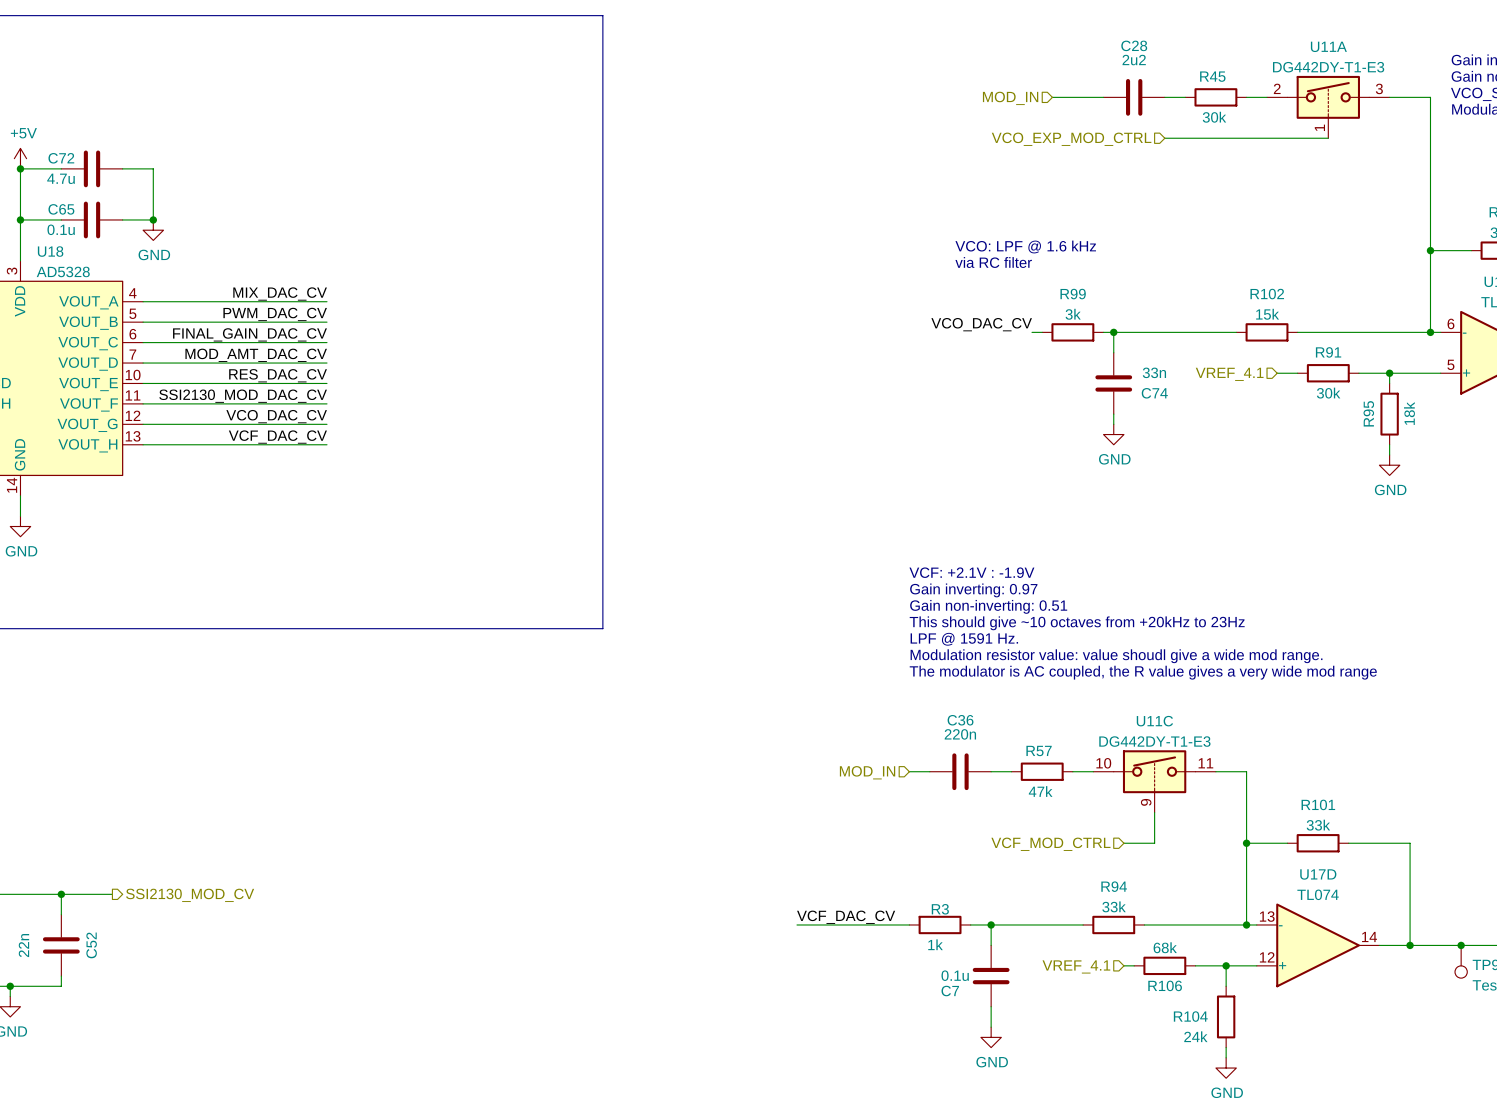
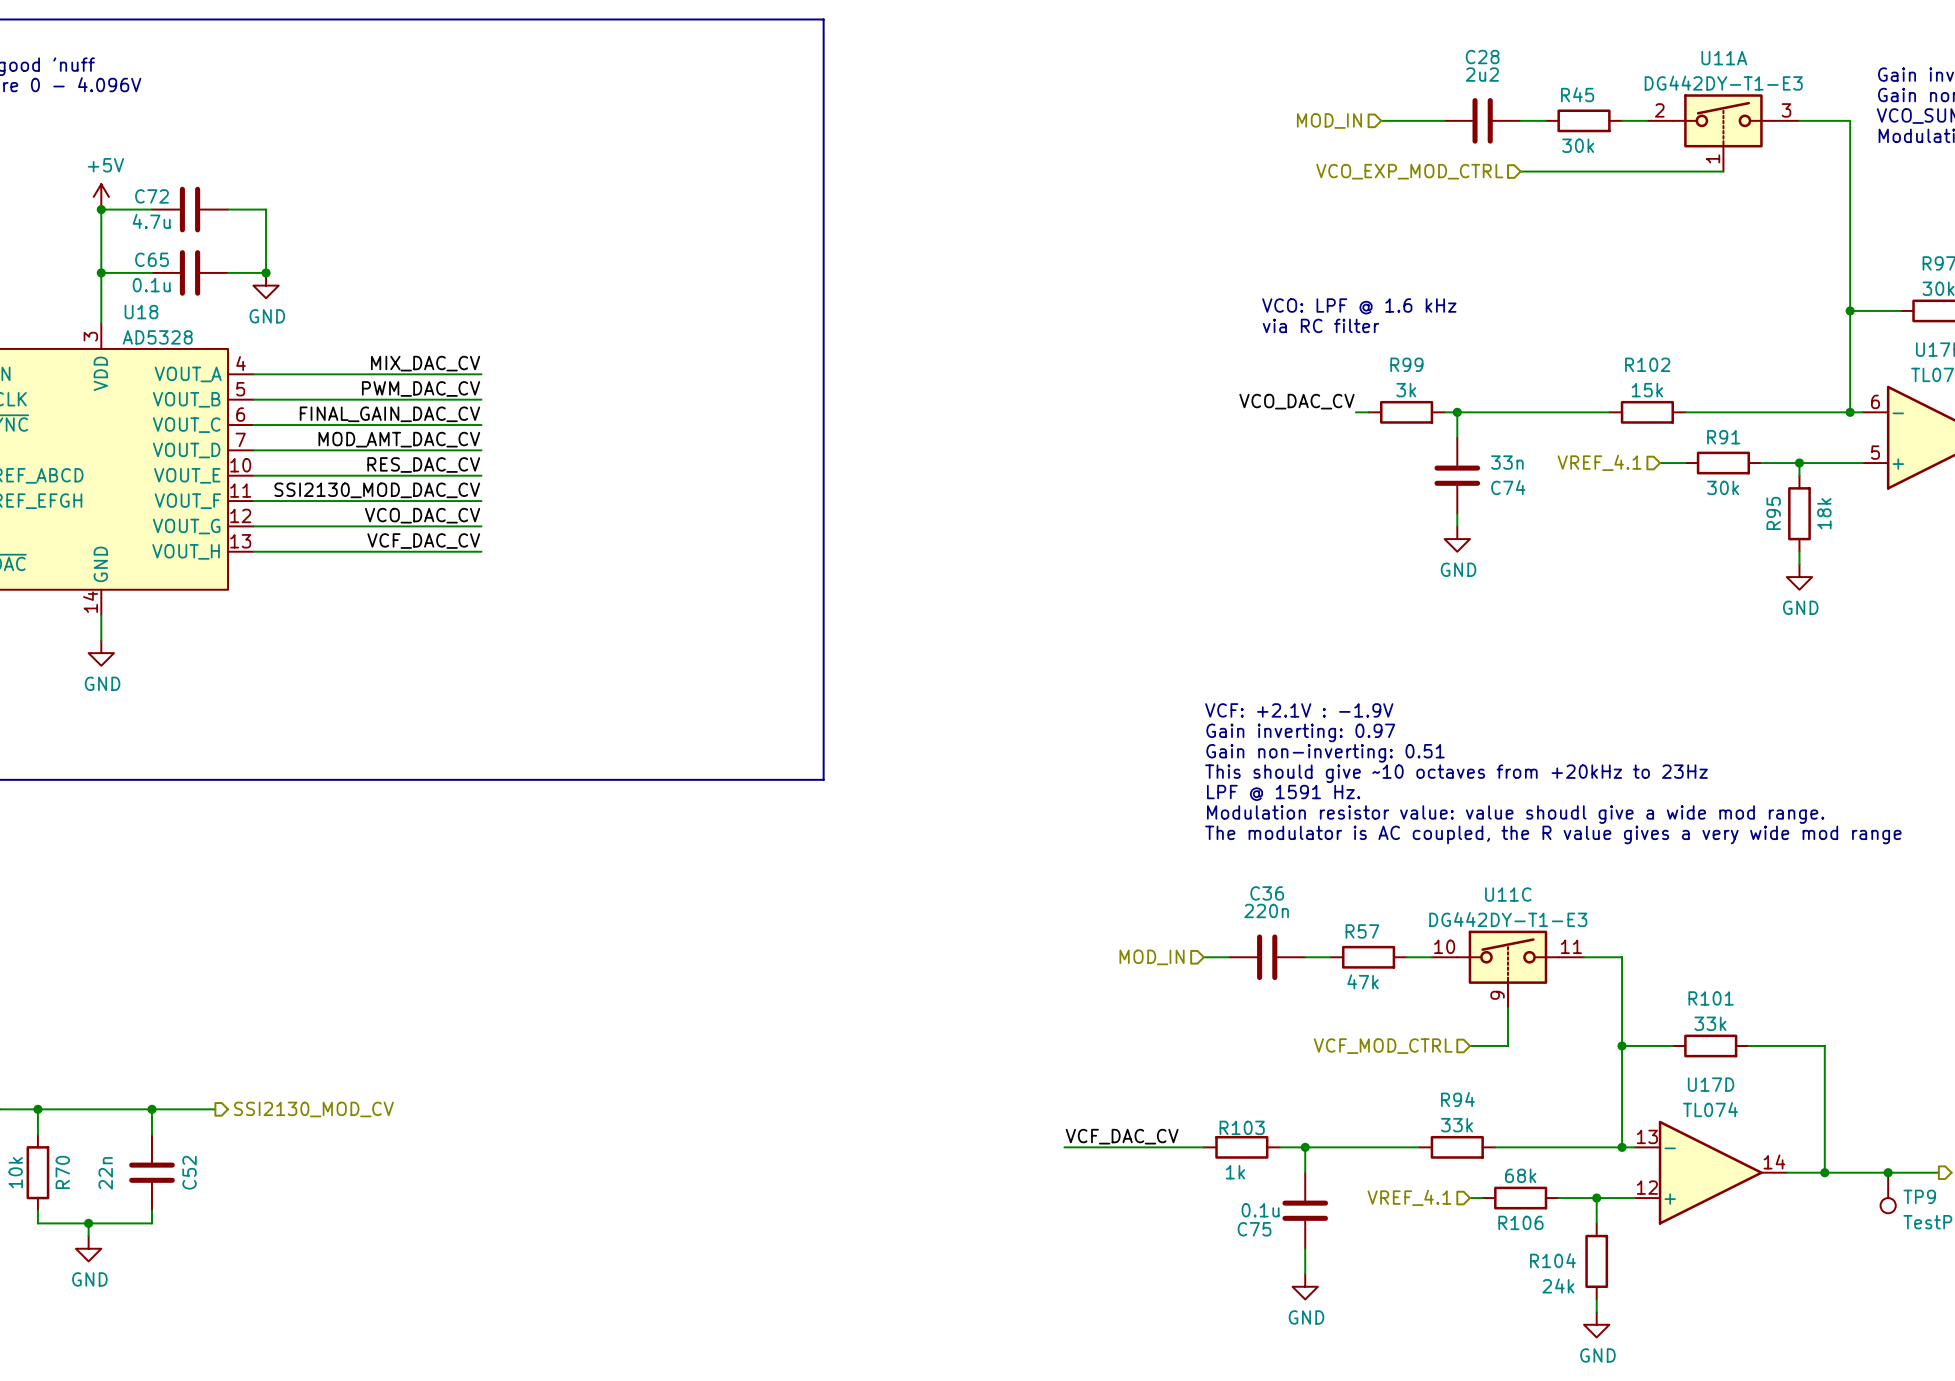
R3 name: R3 (940, 909) -> R103 (1242, 1127)
C7 name: C7 (950, 991) -> C75 (1254, 1229)

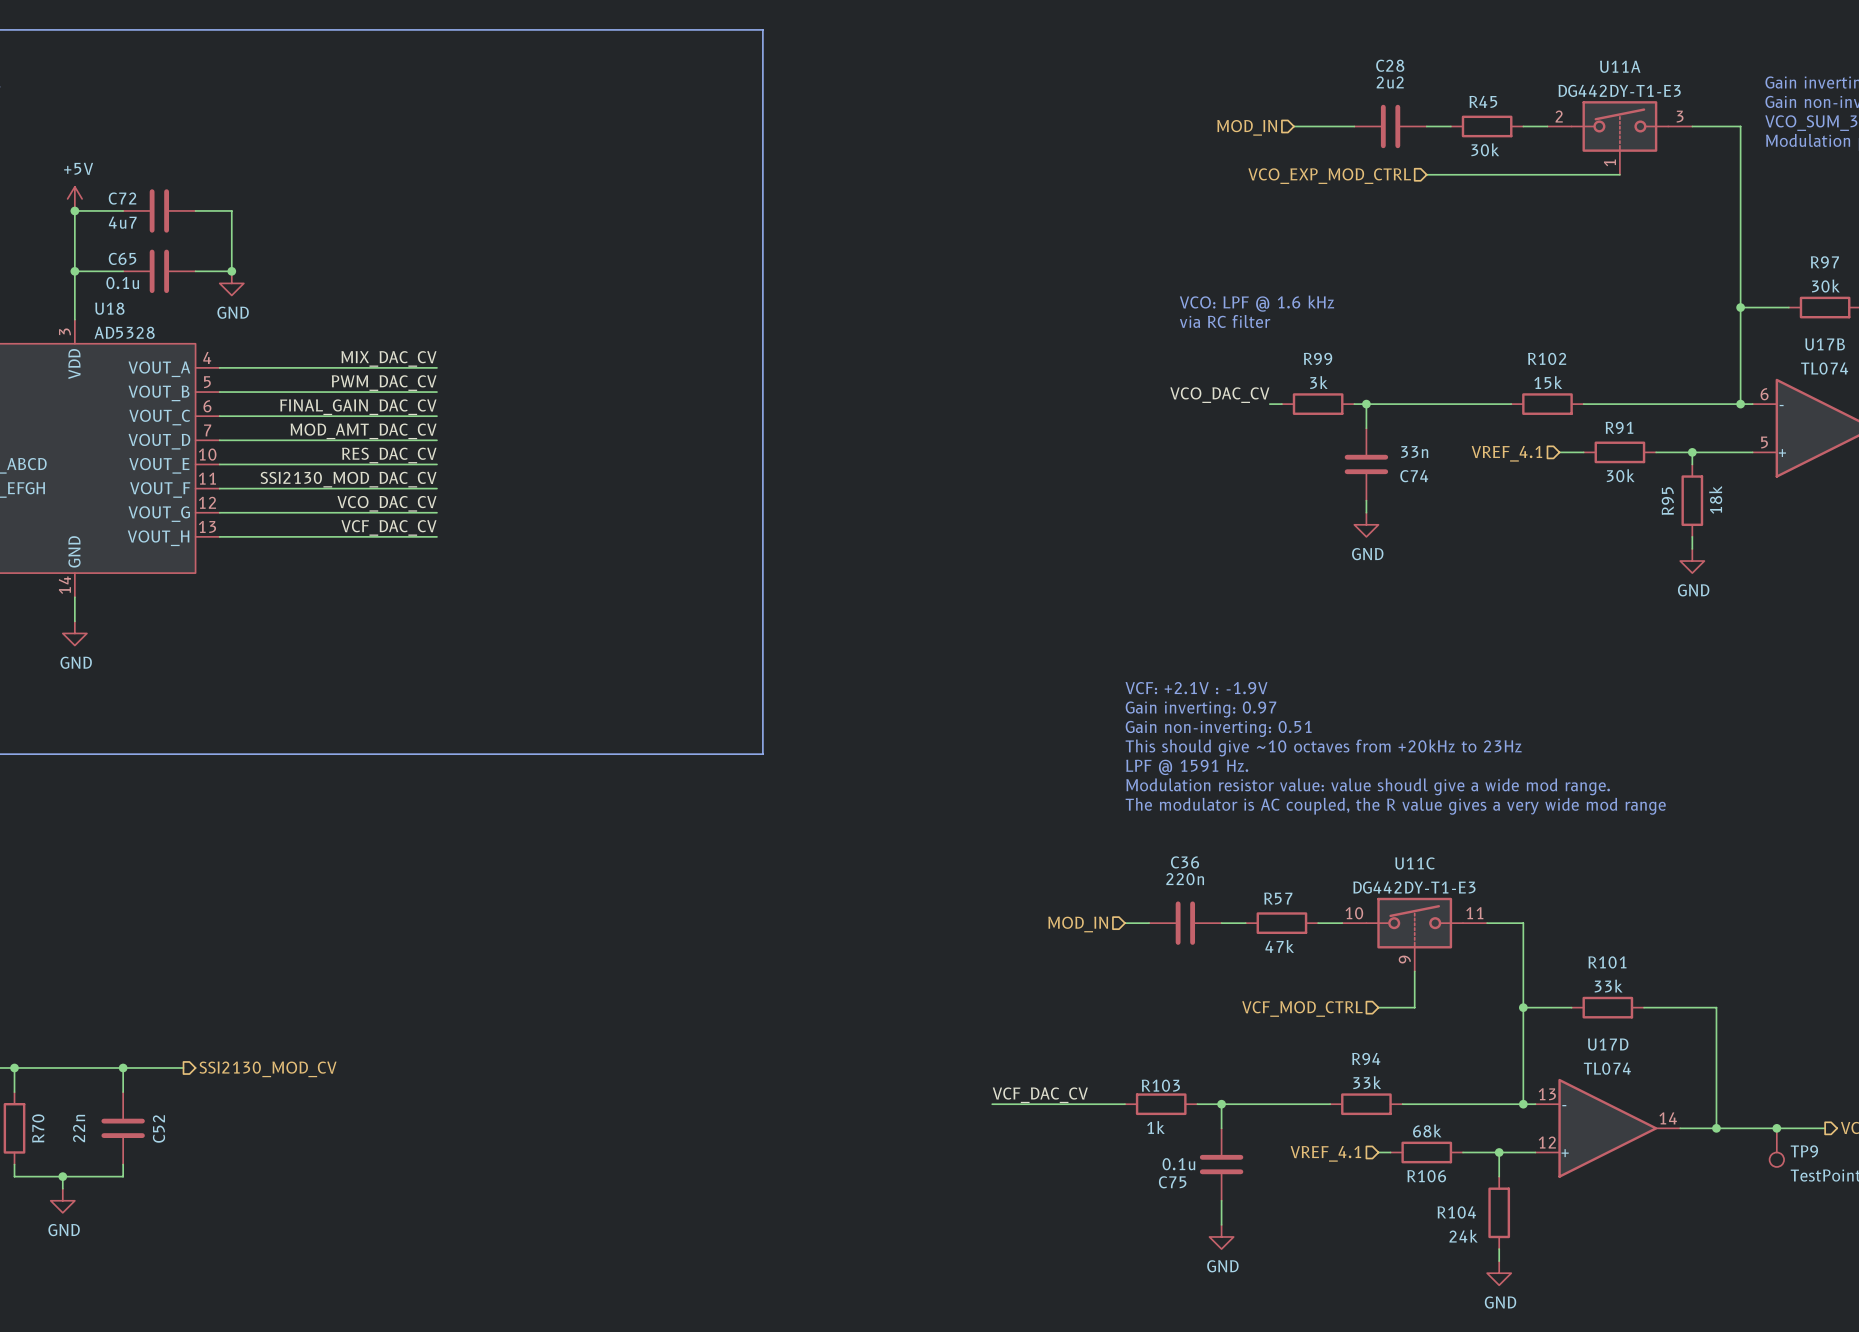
C72 value: 4.7u (151, 221) -> 4u7 (122, 222)

